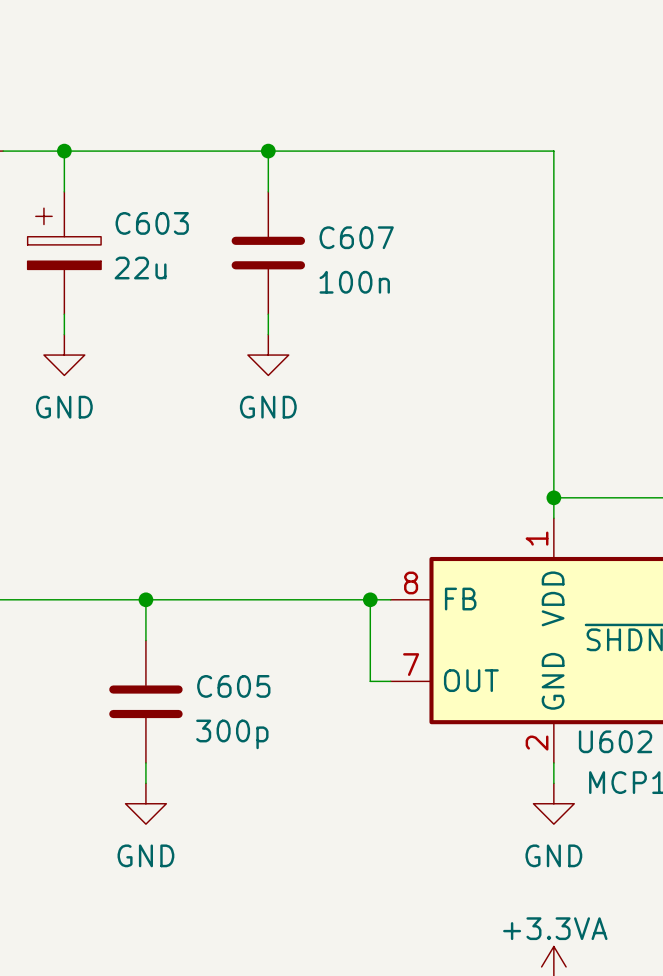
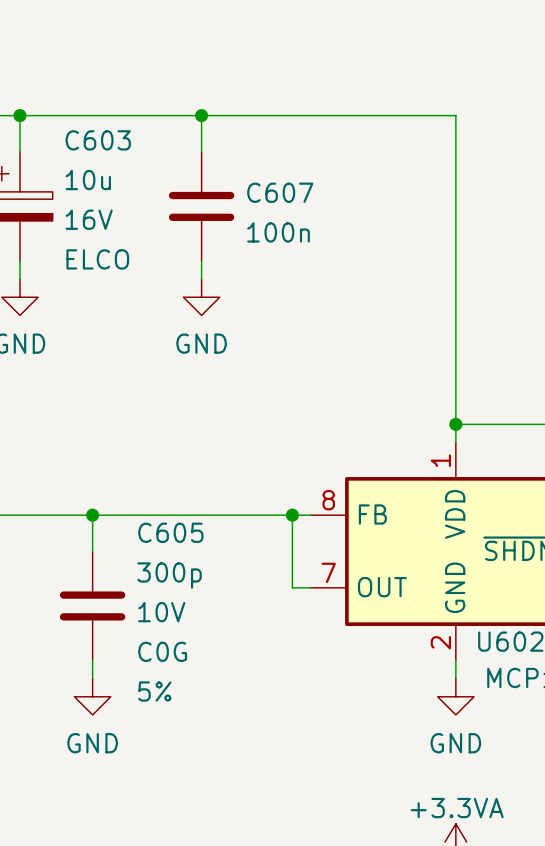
C603 name position: C603 (152, 223) -> C603 (98, 140)
C603 value: 22u (140, 268) -> 10u (88, 180)
C603 text: none -> 16V (89, 219)
C603 text: none -> ELCO (97, 259)
C605 name position: C605 (233, 686) -> C605 (170, 532)
C605 text: none -> 10V (161, 612)
C605 value position: 300p (232, 734) -> 300p (169, 575)
C605 text: none -> C0G (162, 651)
C605 text: none -> 5% (154, 691)

